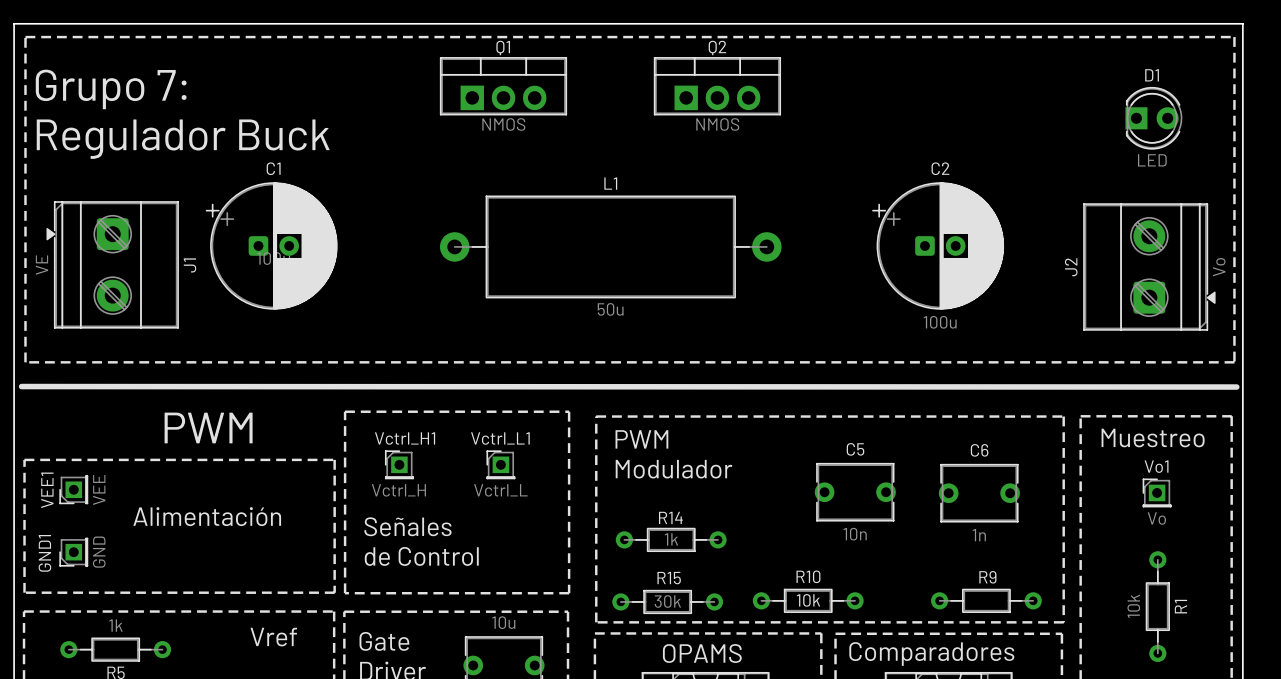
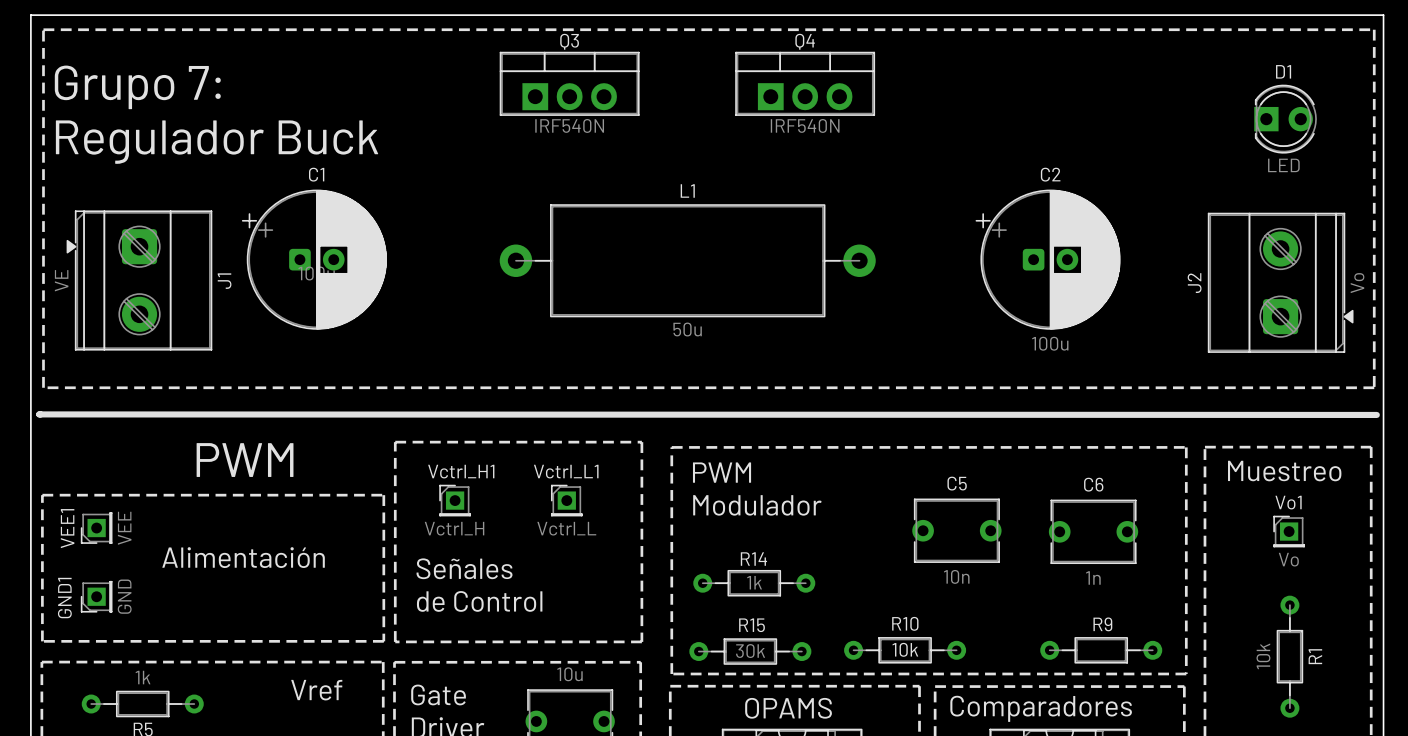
Q1 name: Q1 (503, 48) -> Q3 (569, 41)
Q2 name: Q2 (717, 48) -> Q4 (805, 41)
Q1 value: NMOS (503, 124) -> IRF540N (569, 125)
Q2 value: NMOS (717, 124) -> IRF540N (805, 125)

